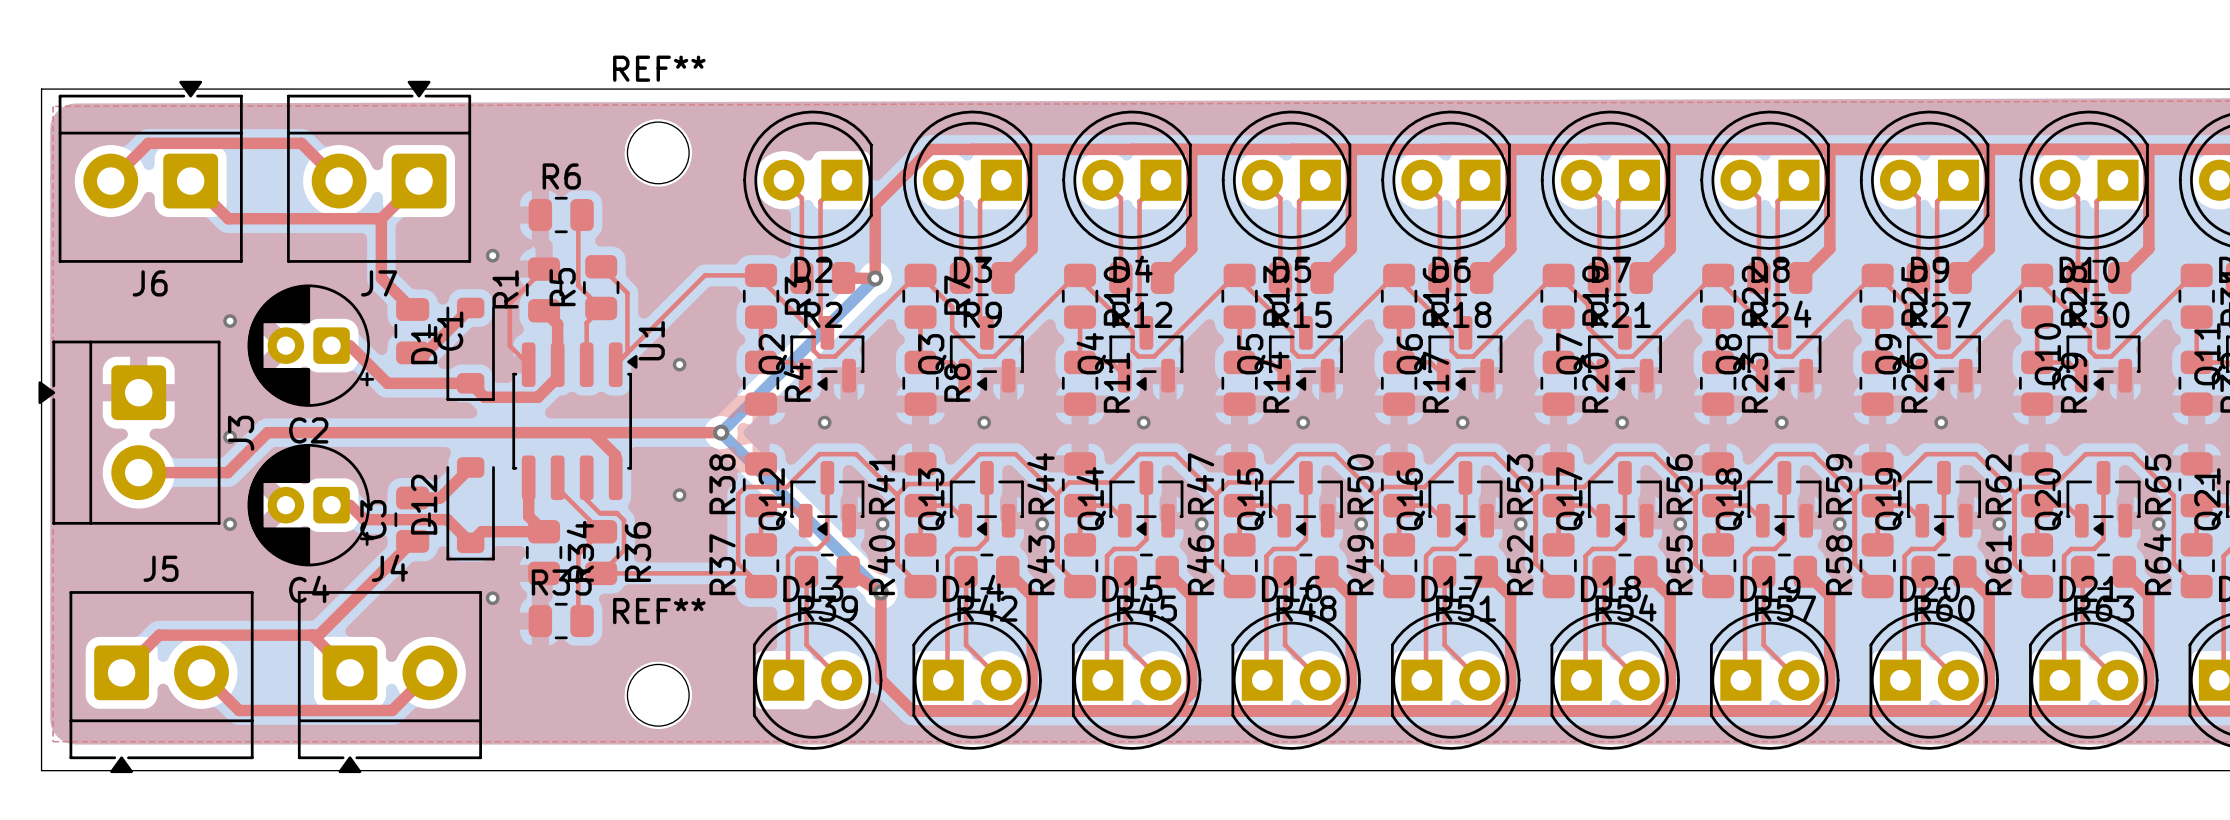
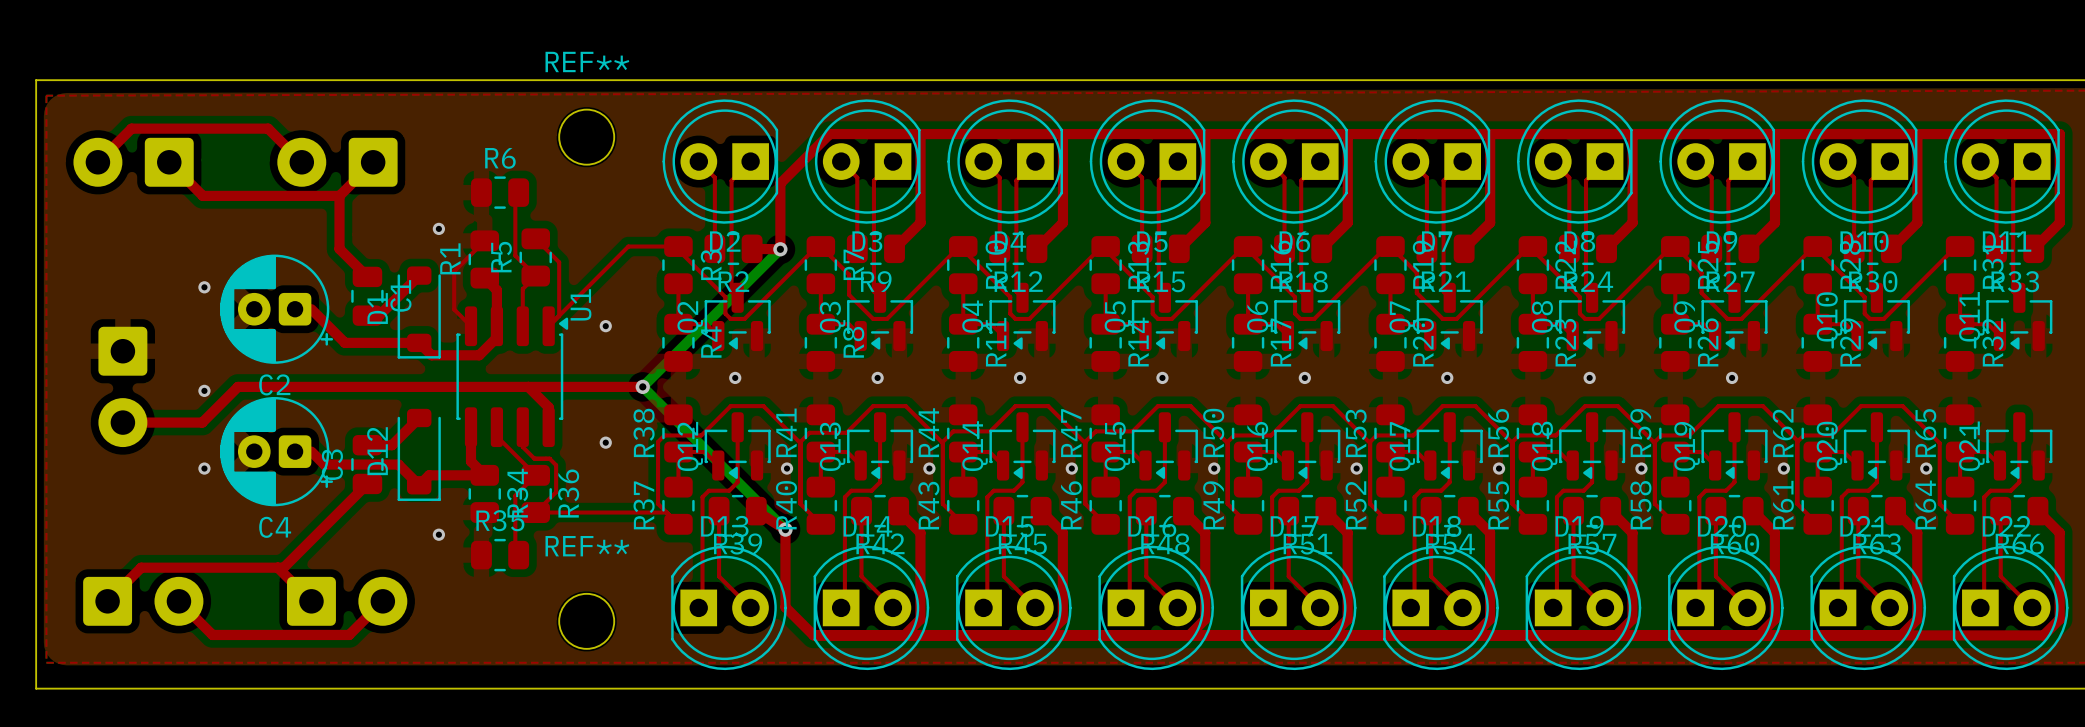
J6 side: top (150, 171) -> bottom (133, 162)
J7 side: top (379, 171) -> bottom (337, 162)
J3 side: top (129, 432) -> bottom (122, 386)
J5 side: top (161, 682) -> bottom (143, 601)
J4 side: top (389, 682) -> bottom (347, 601)

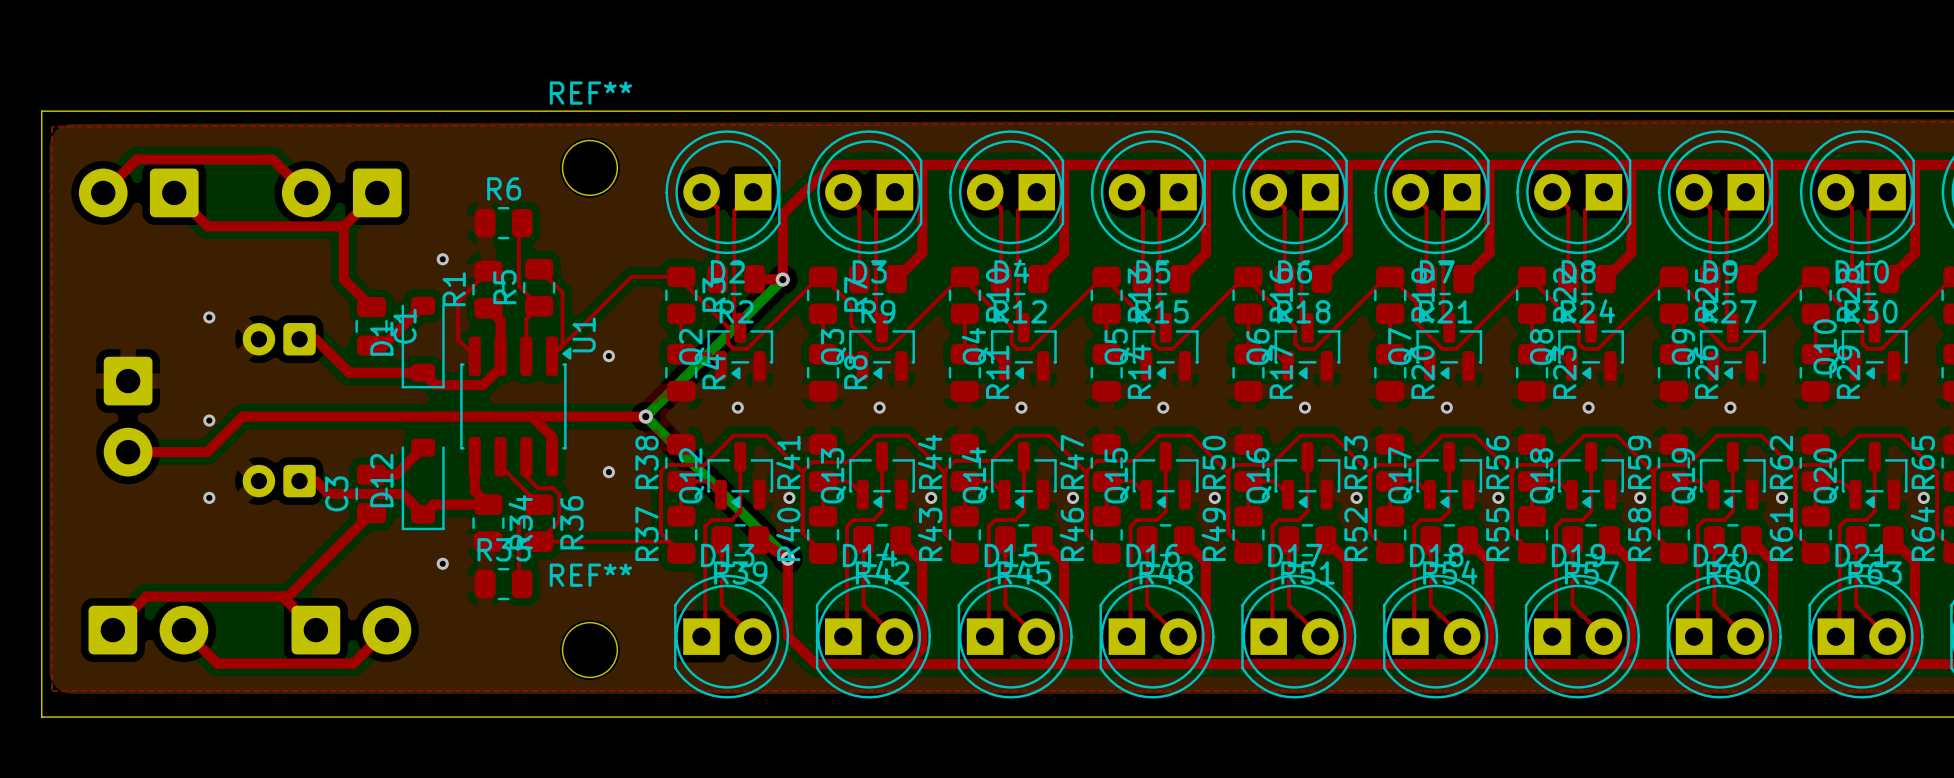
C2 side: top (276, 309) -> bottom (279, 339)
C4 side: top (276, 451) -> bottom (279, 481)

